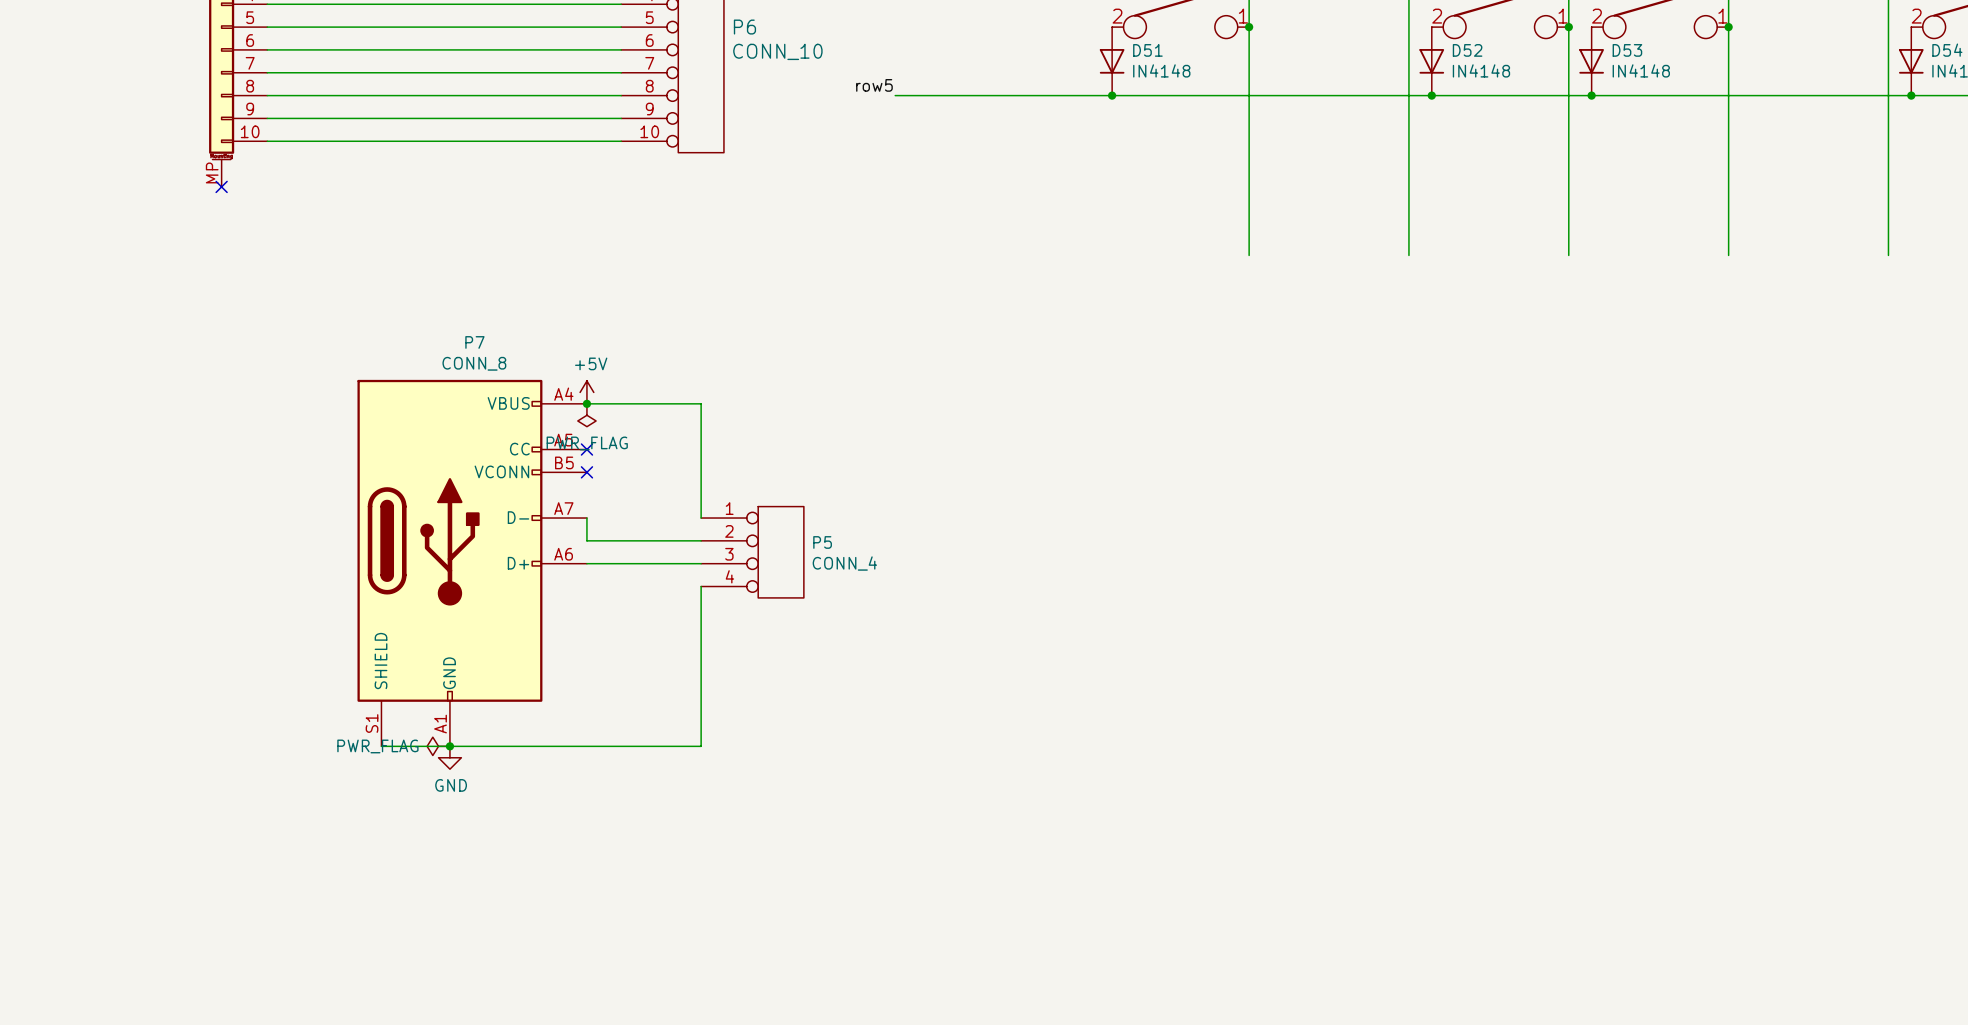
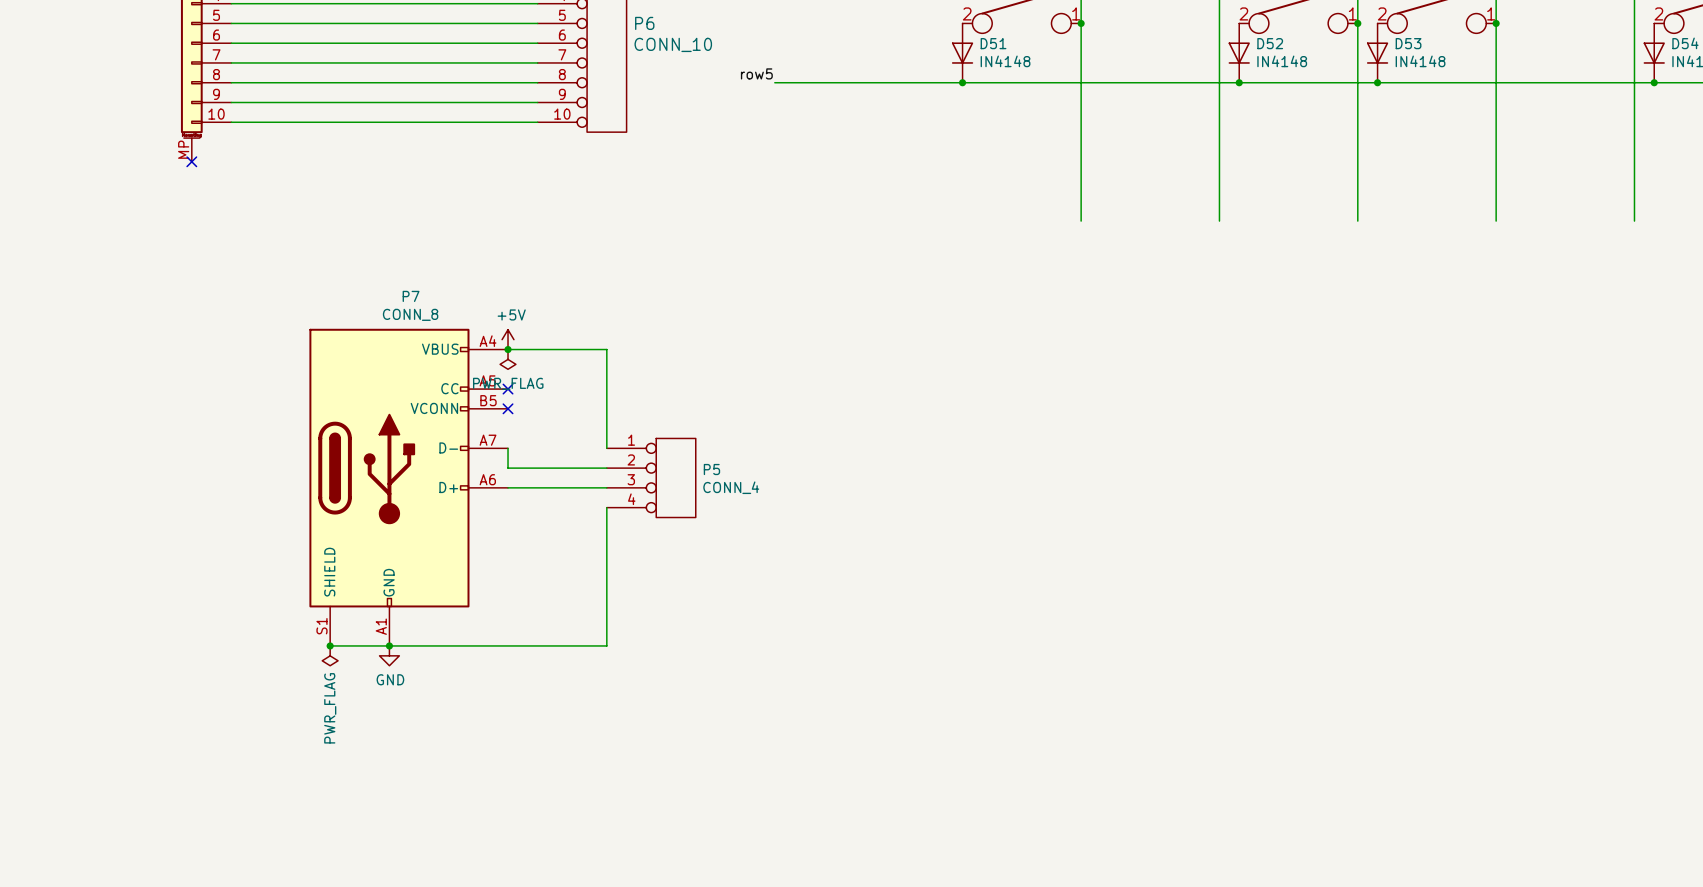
junction: none -> (330, 645)
power symbol rotation: 0° (438, 746) -> 90° counterclockwise (330, 655)
power symbol position: PWR_FLAG (438, 746) -> PWR_FLAG (330, 655)

